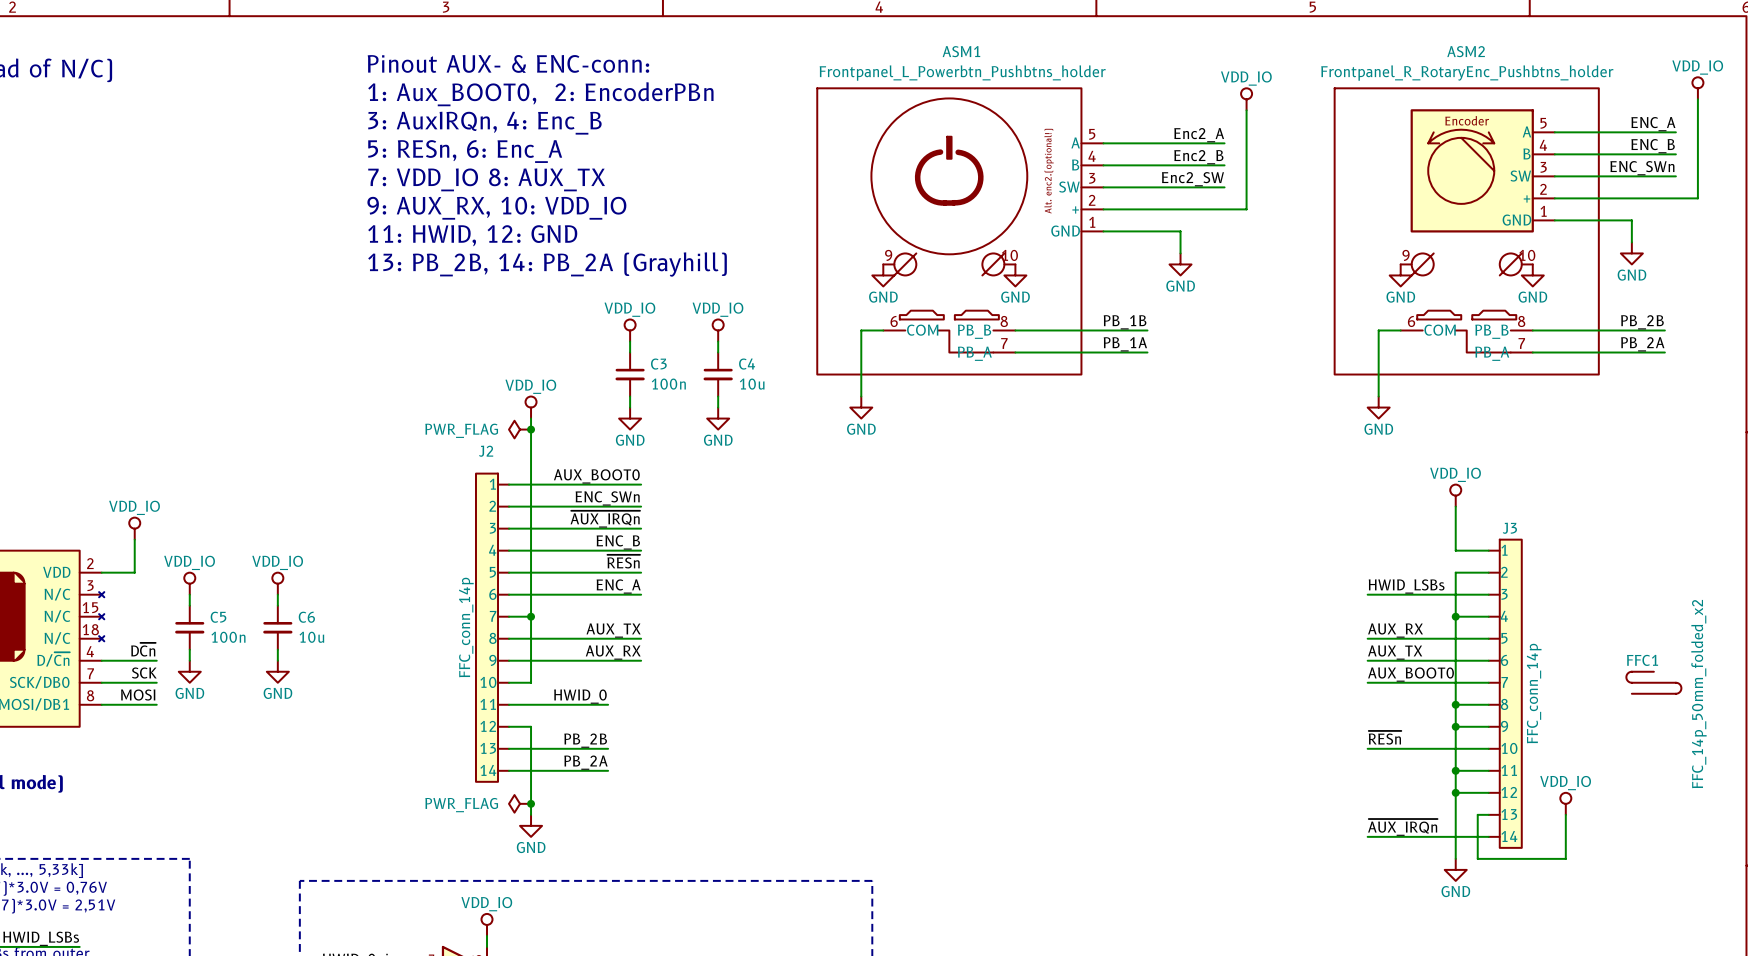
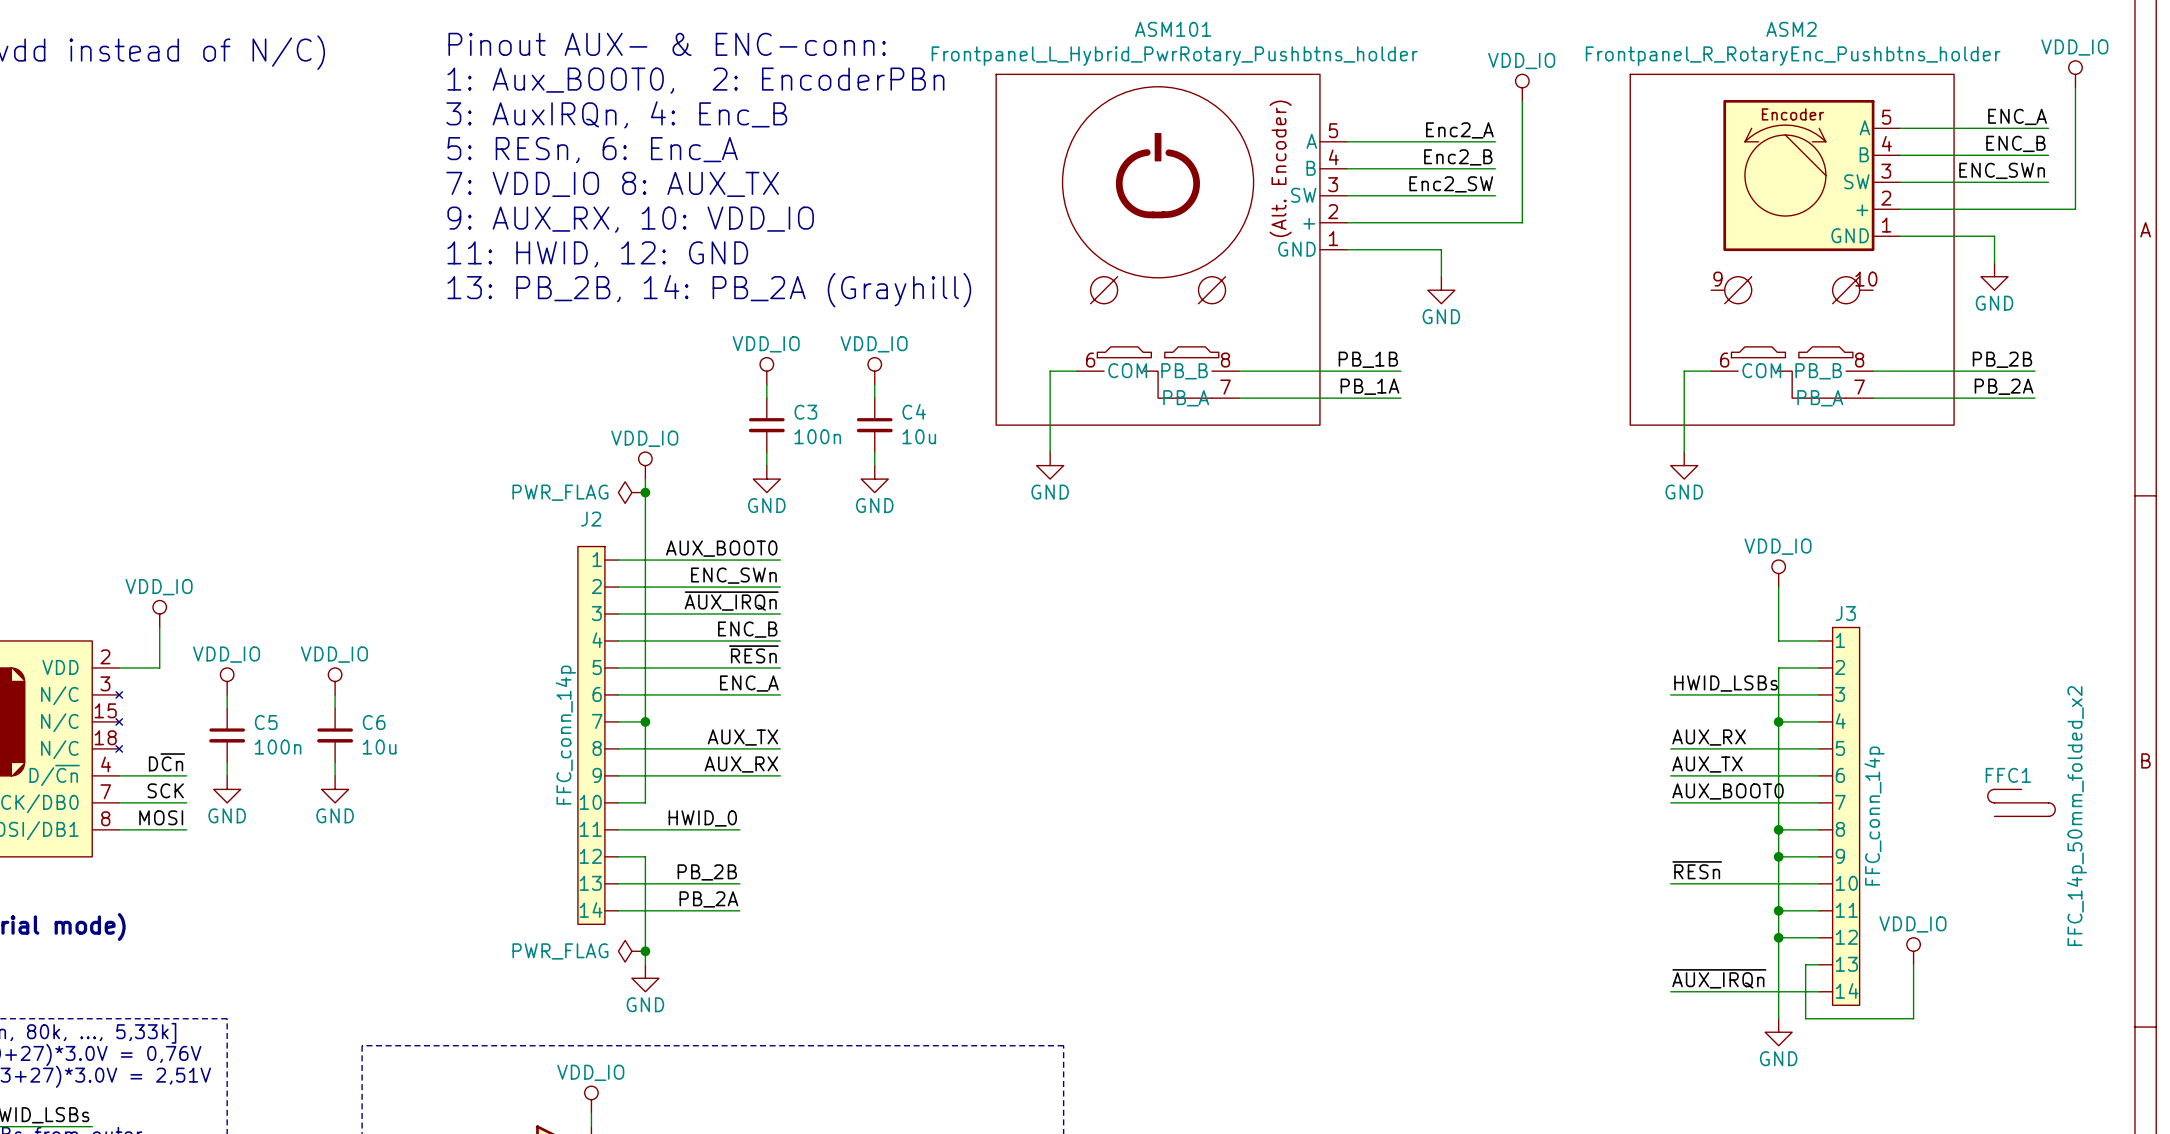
ASM1: Frontpanel_L_Powerbtn_Pushbtns_holder (960, 231) -> none
ASM101: none -> Frontpanel_L_Hybrid_PwrRotary_Pushbtns_holder (1171, 249)
power symbol: GND (883, 275) -> none
power symbol: GND (1015, 275) -> none
power symbol: GND (1400, 275) -> none
power symbol: GND (1532, 275) -> none

